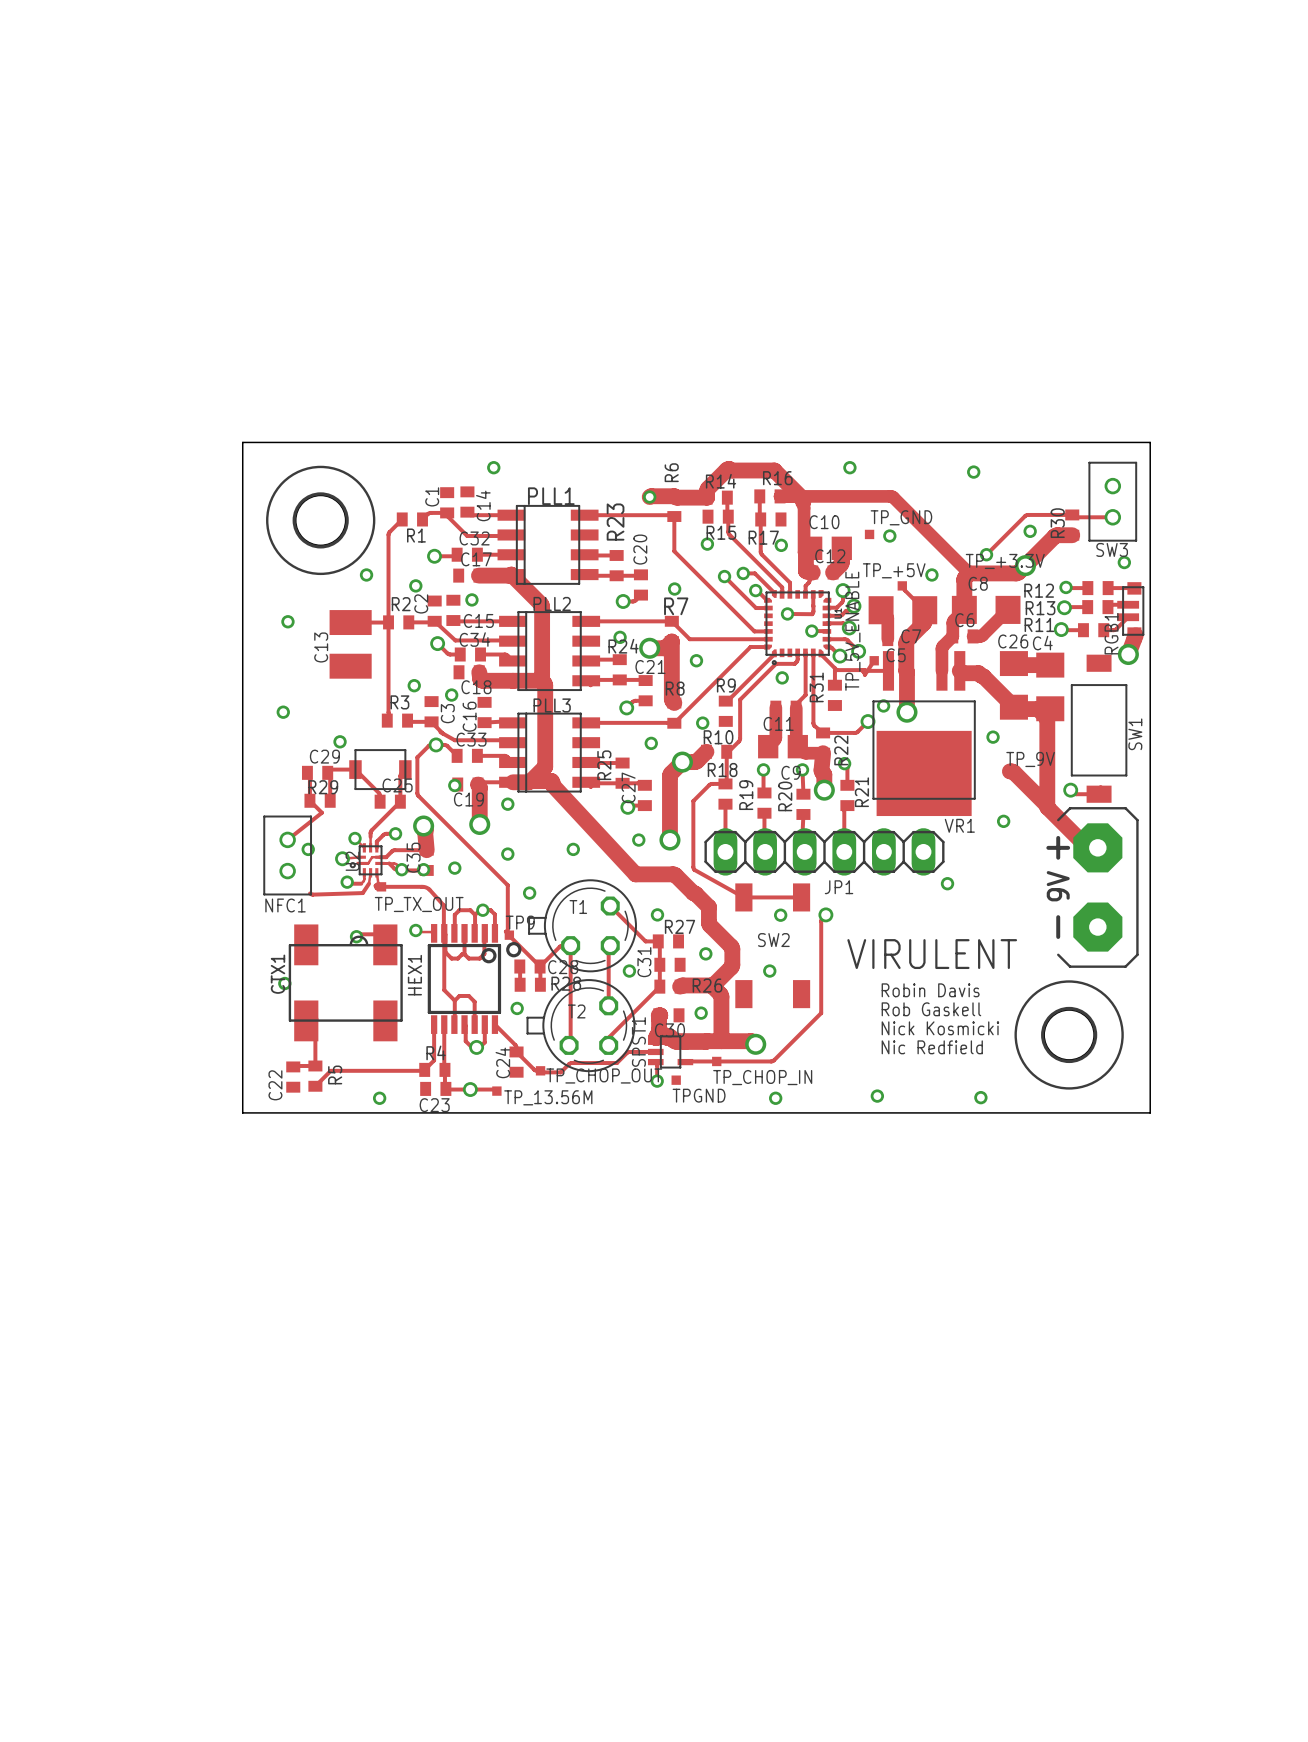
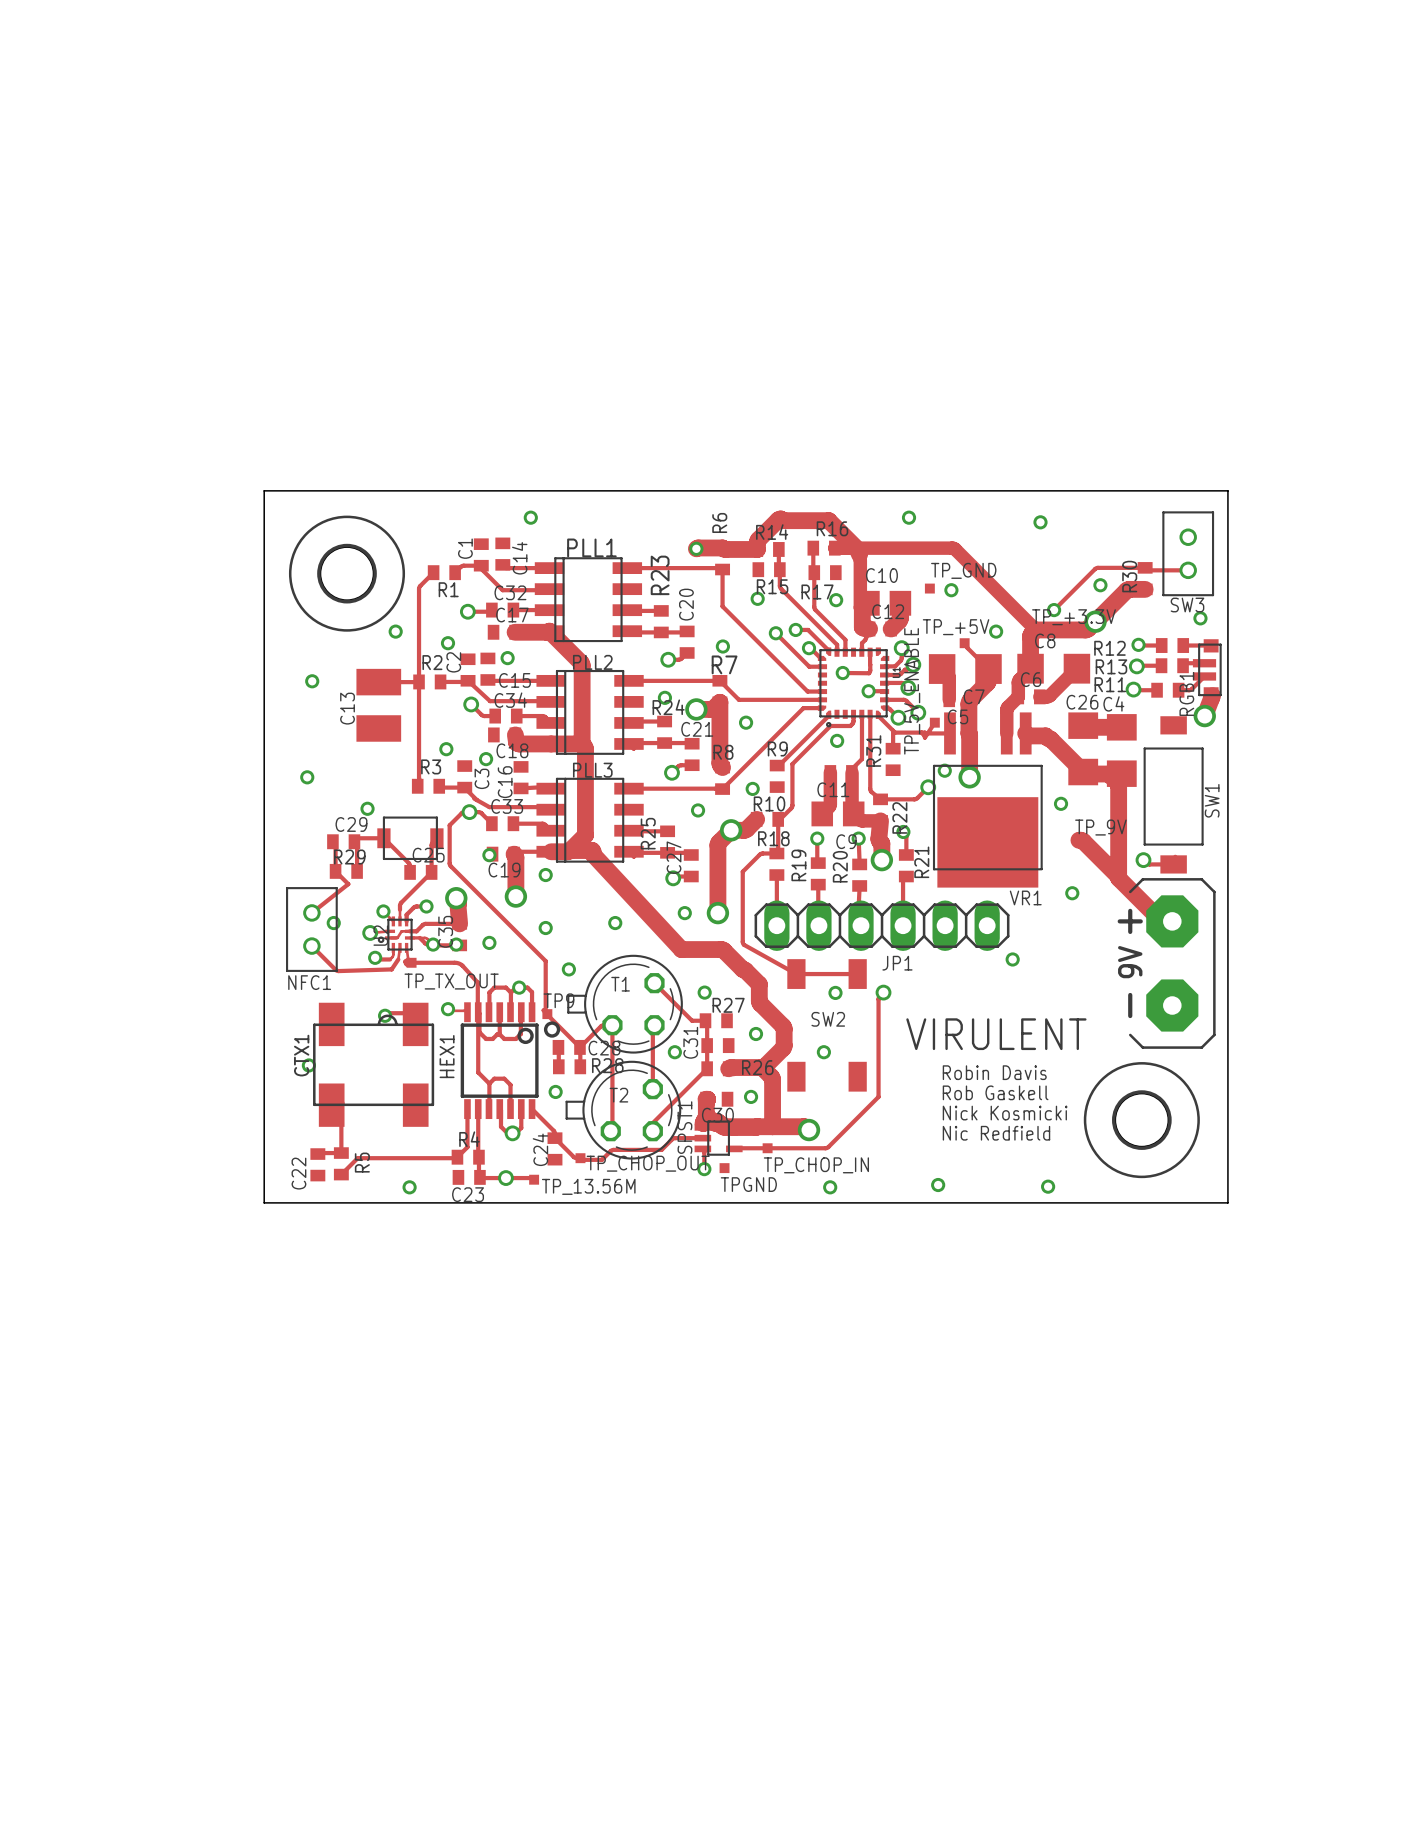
track: none -> (311, 946) (335, 969)

